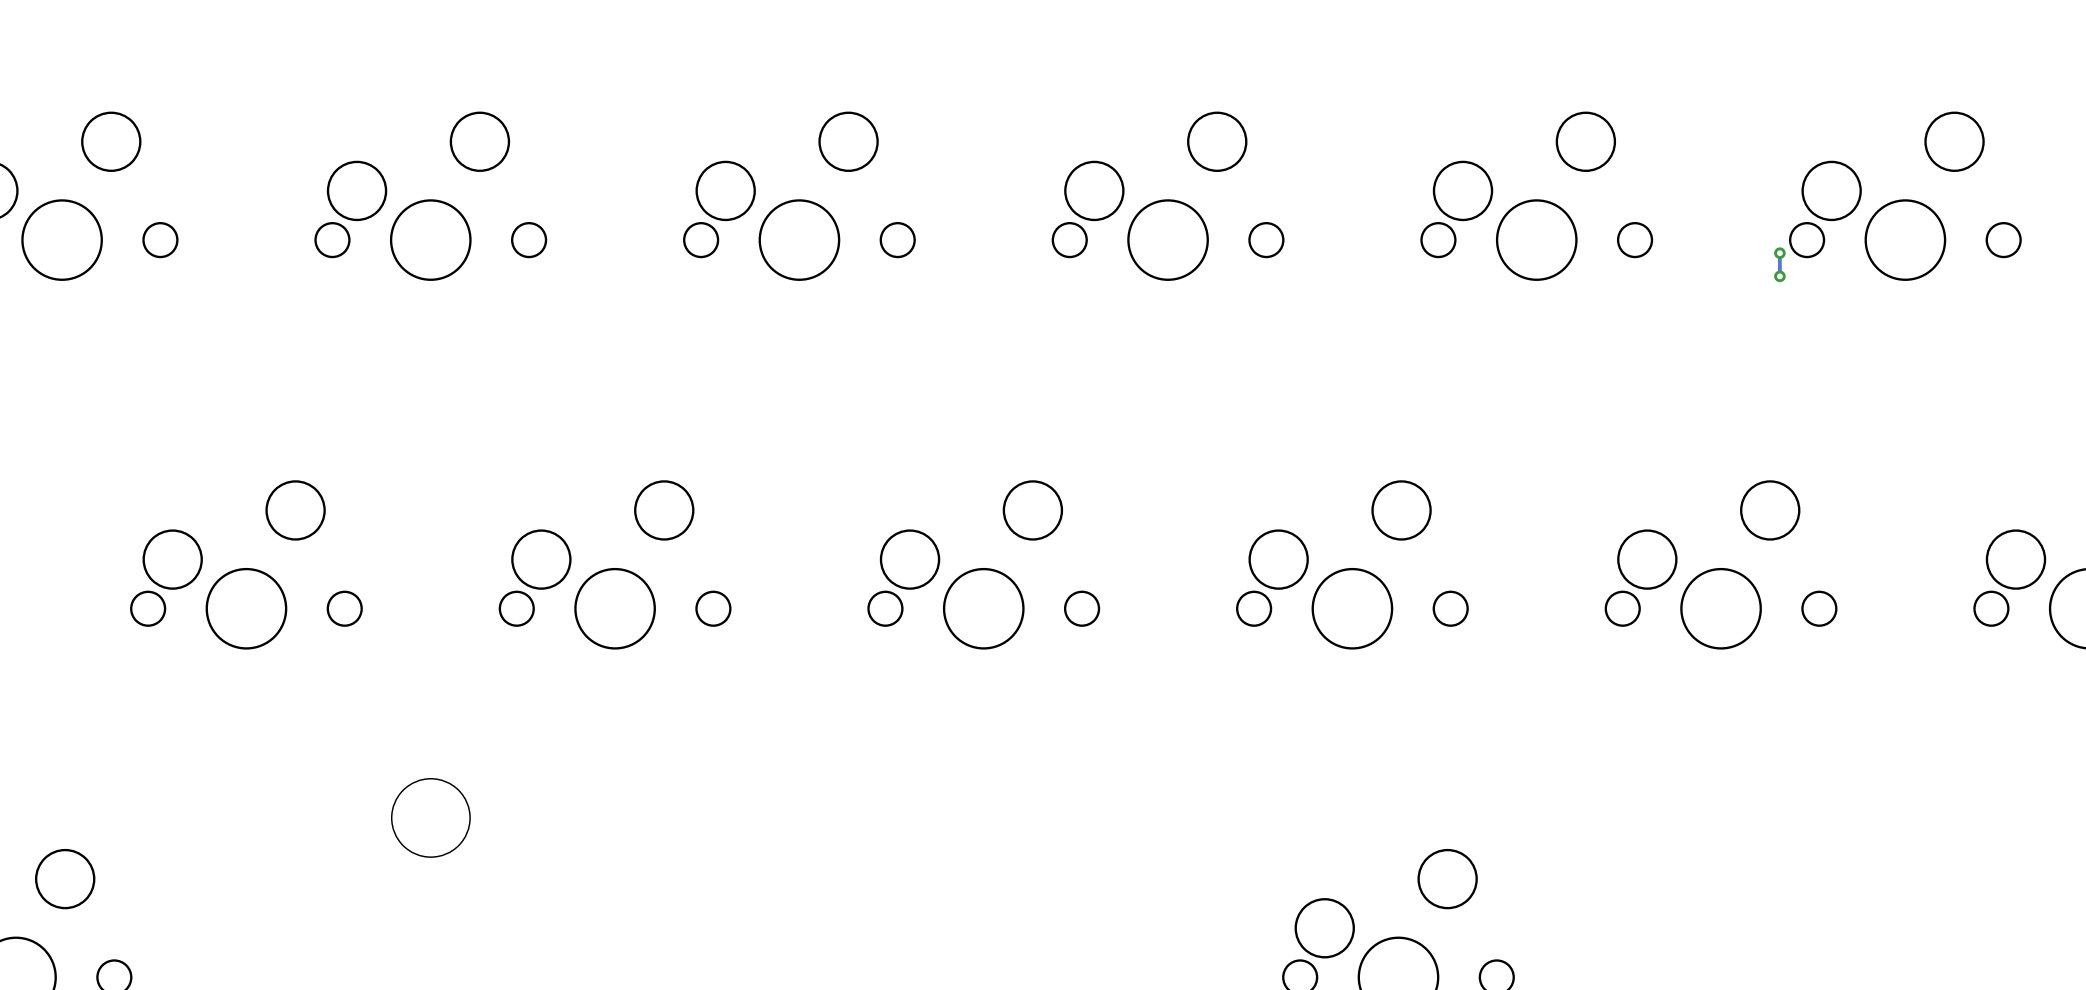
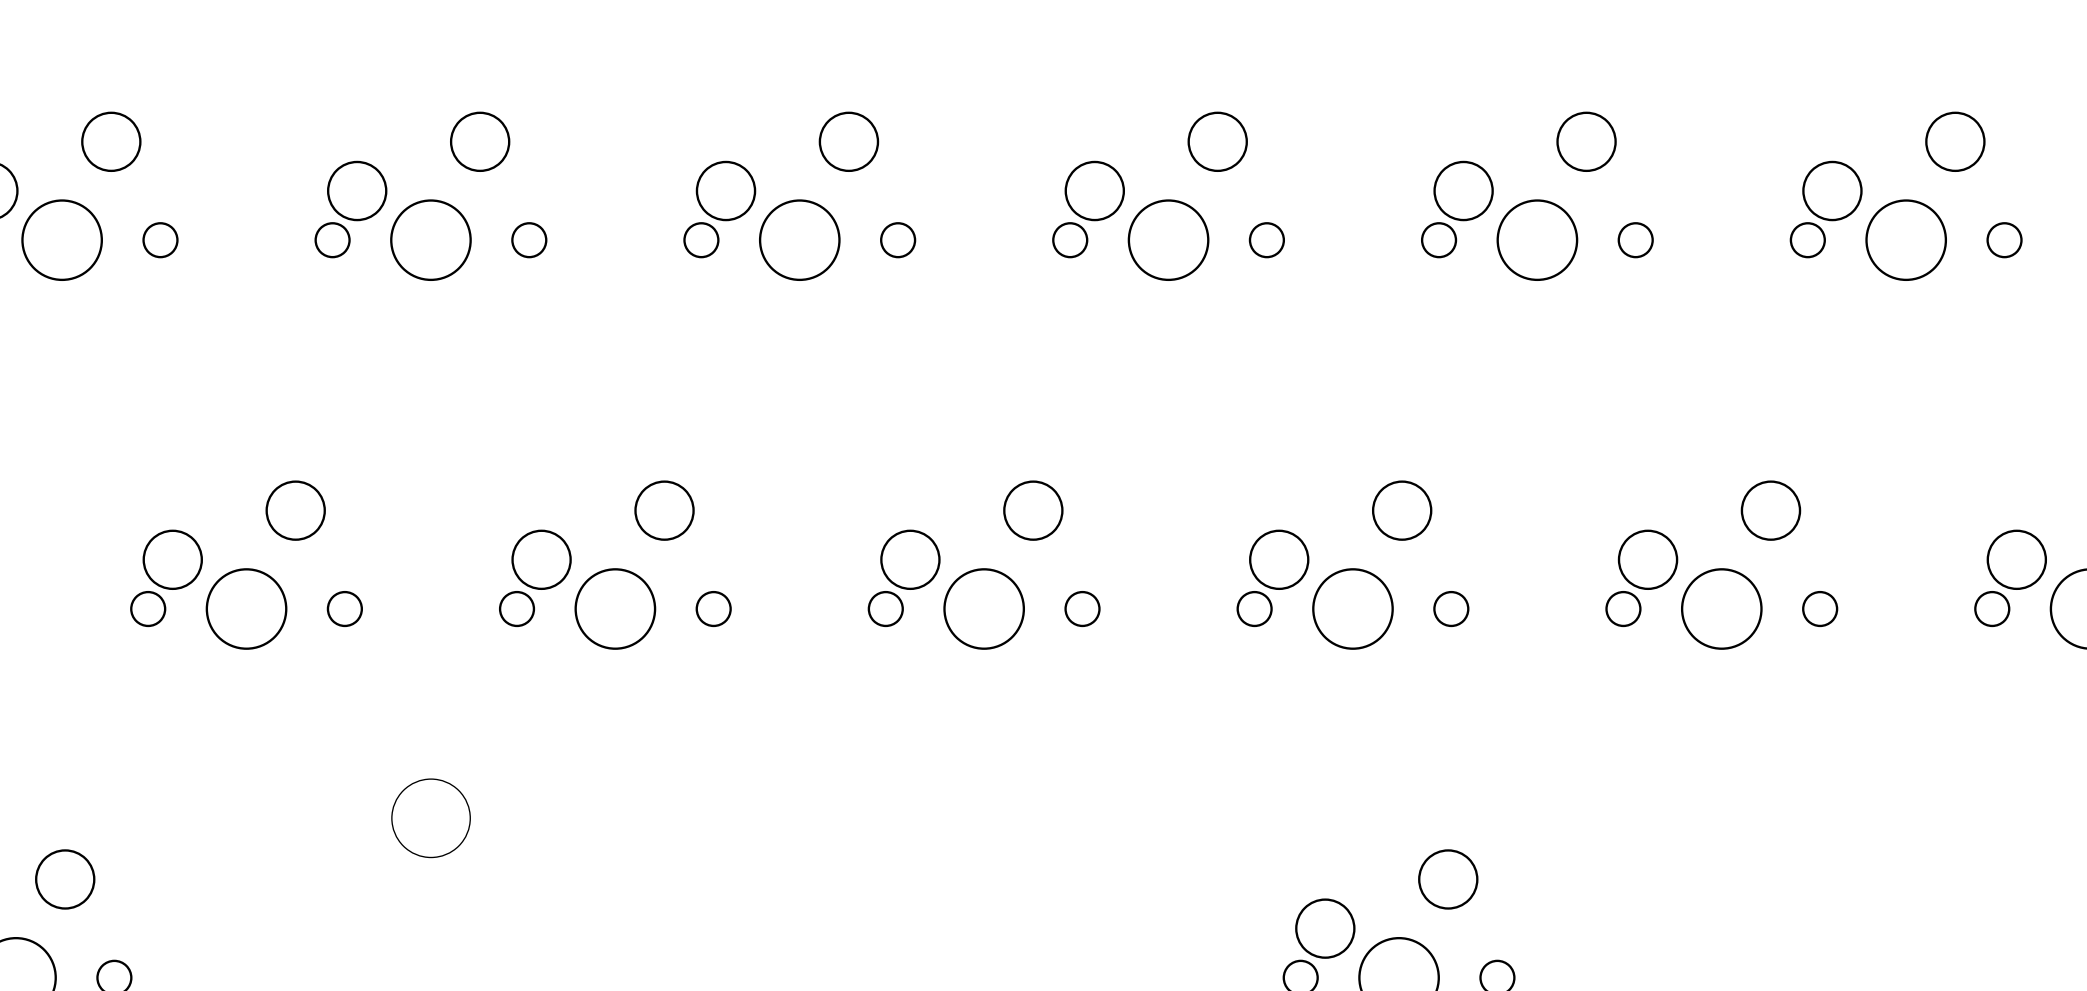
track: (1779, 253) (1779, 276) -> none
via: (1779, 253) -> none
via: (1779, 276) -> none

